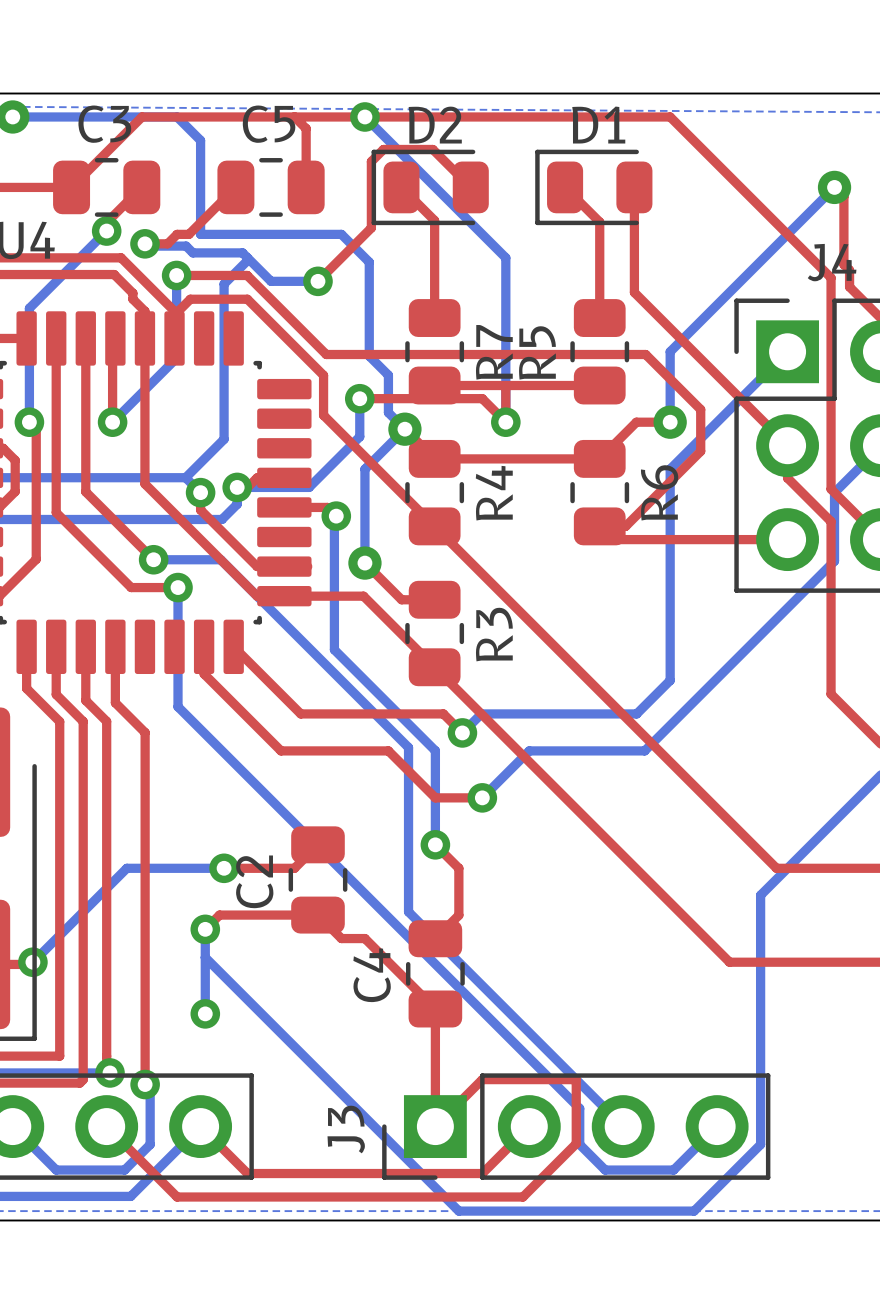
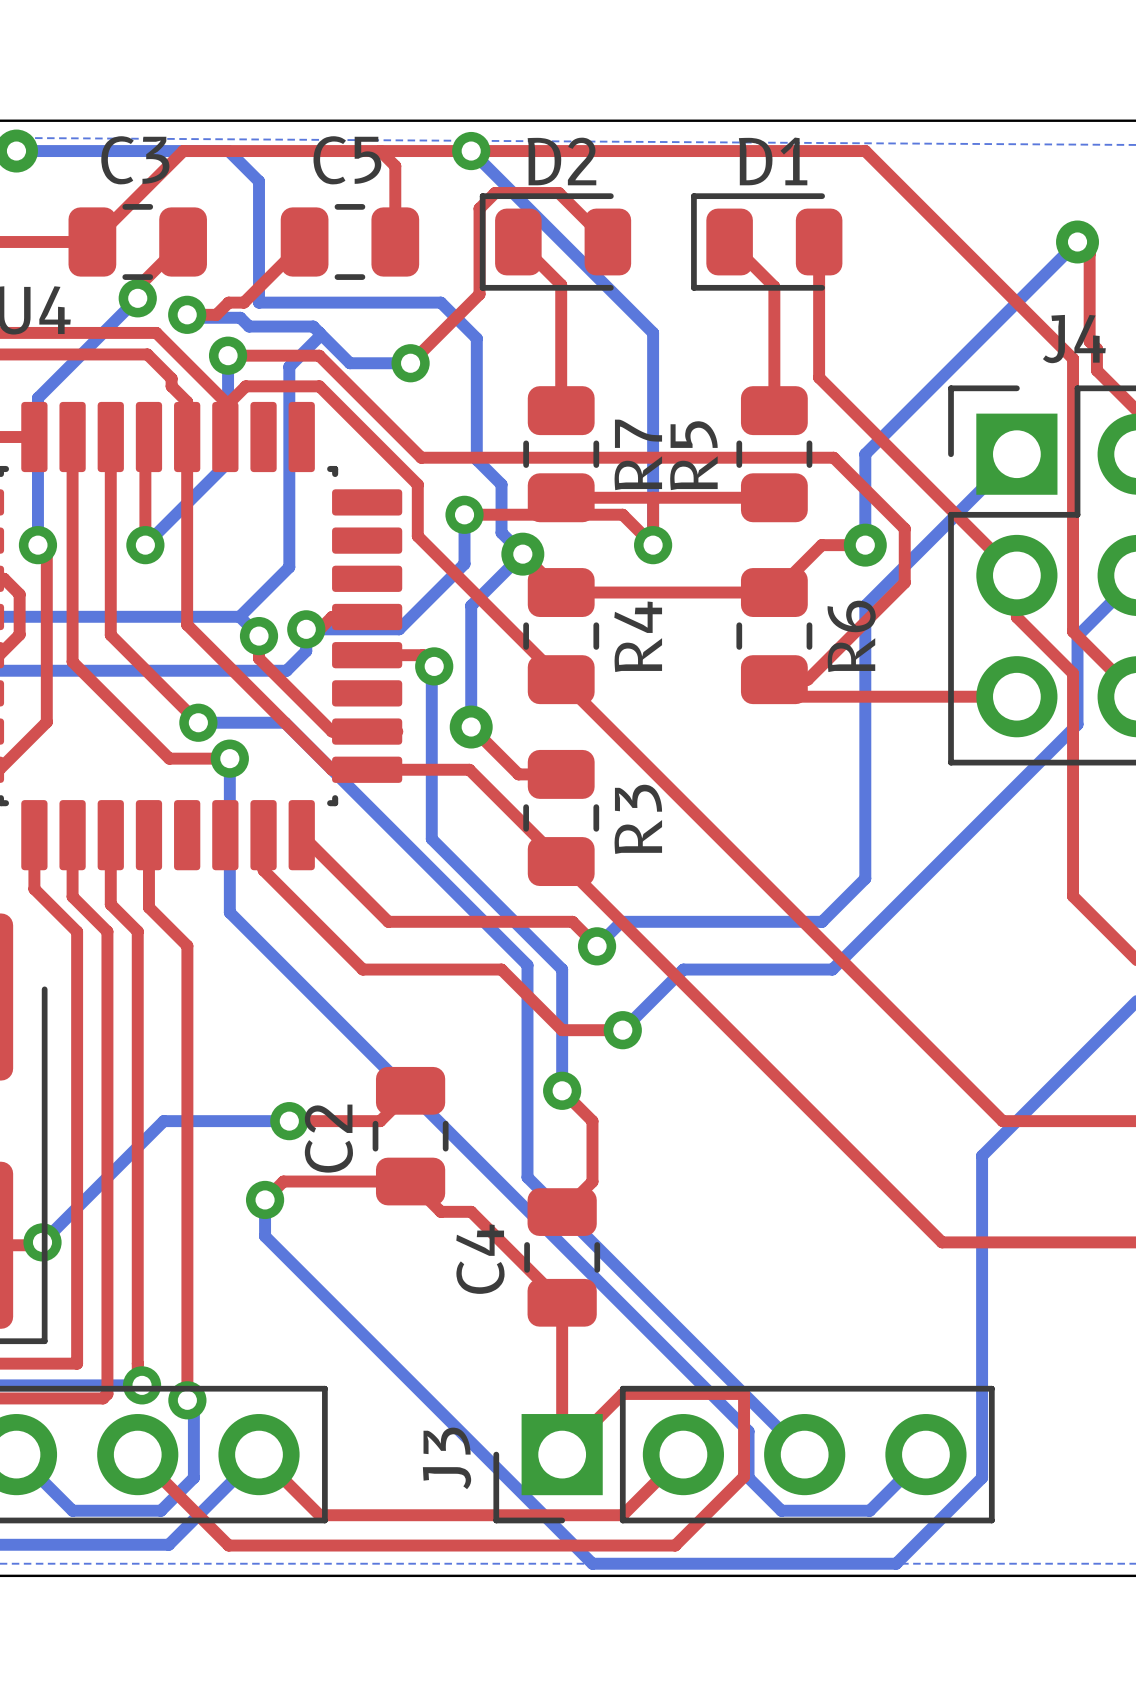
bottom track: (205, 957) (205, 1013) -> none
via: (205, 1013) -> none

